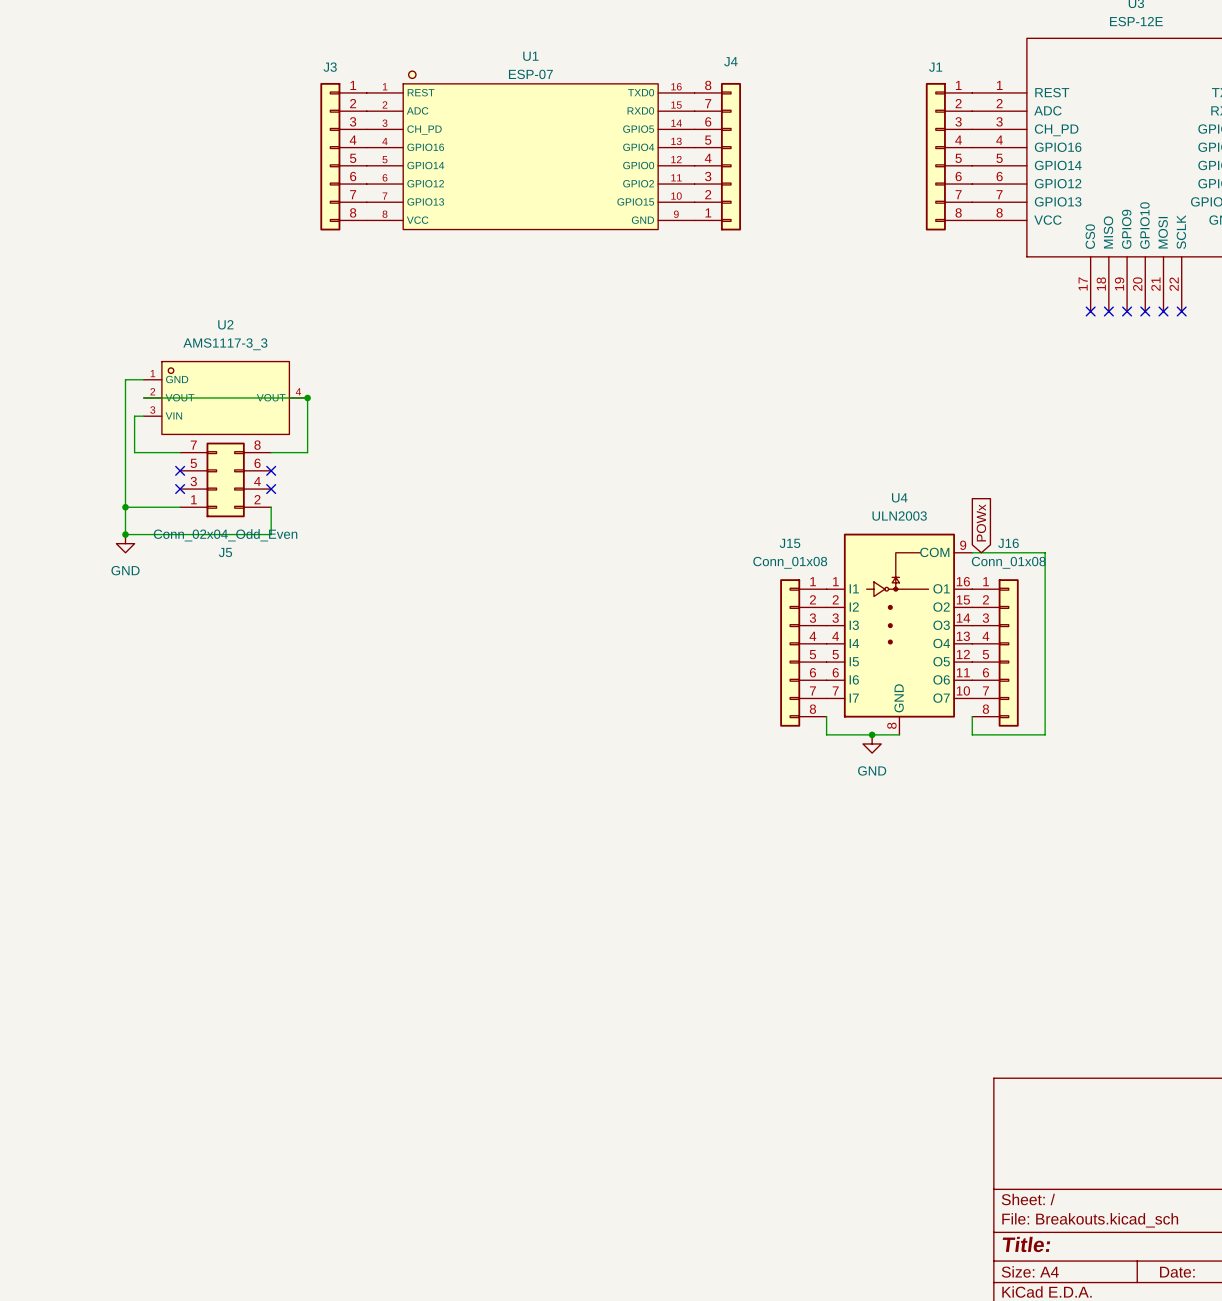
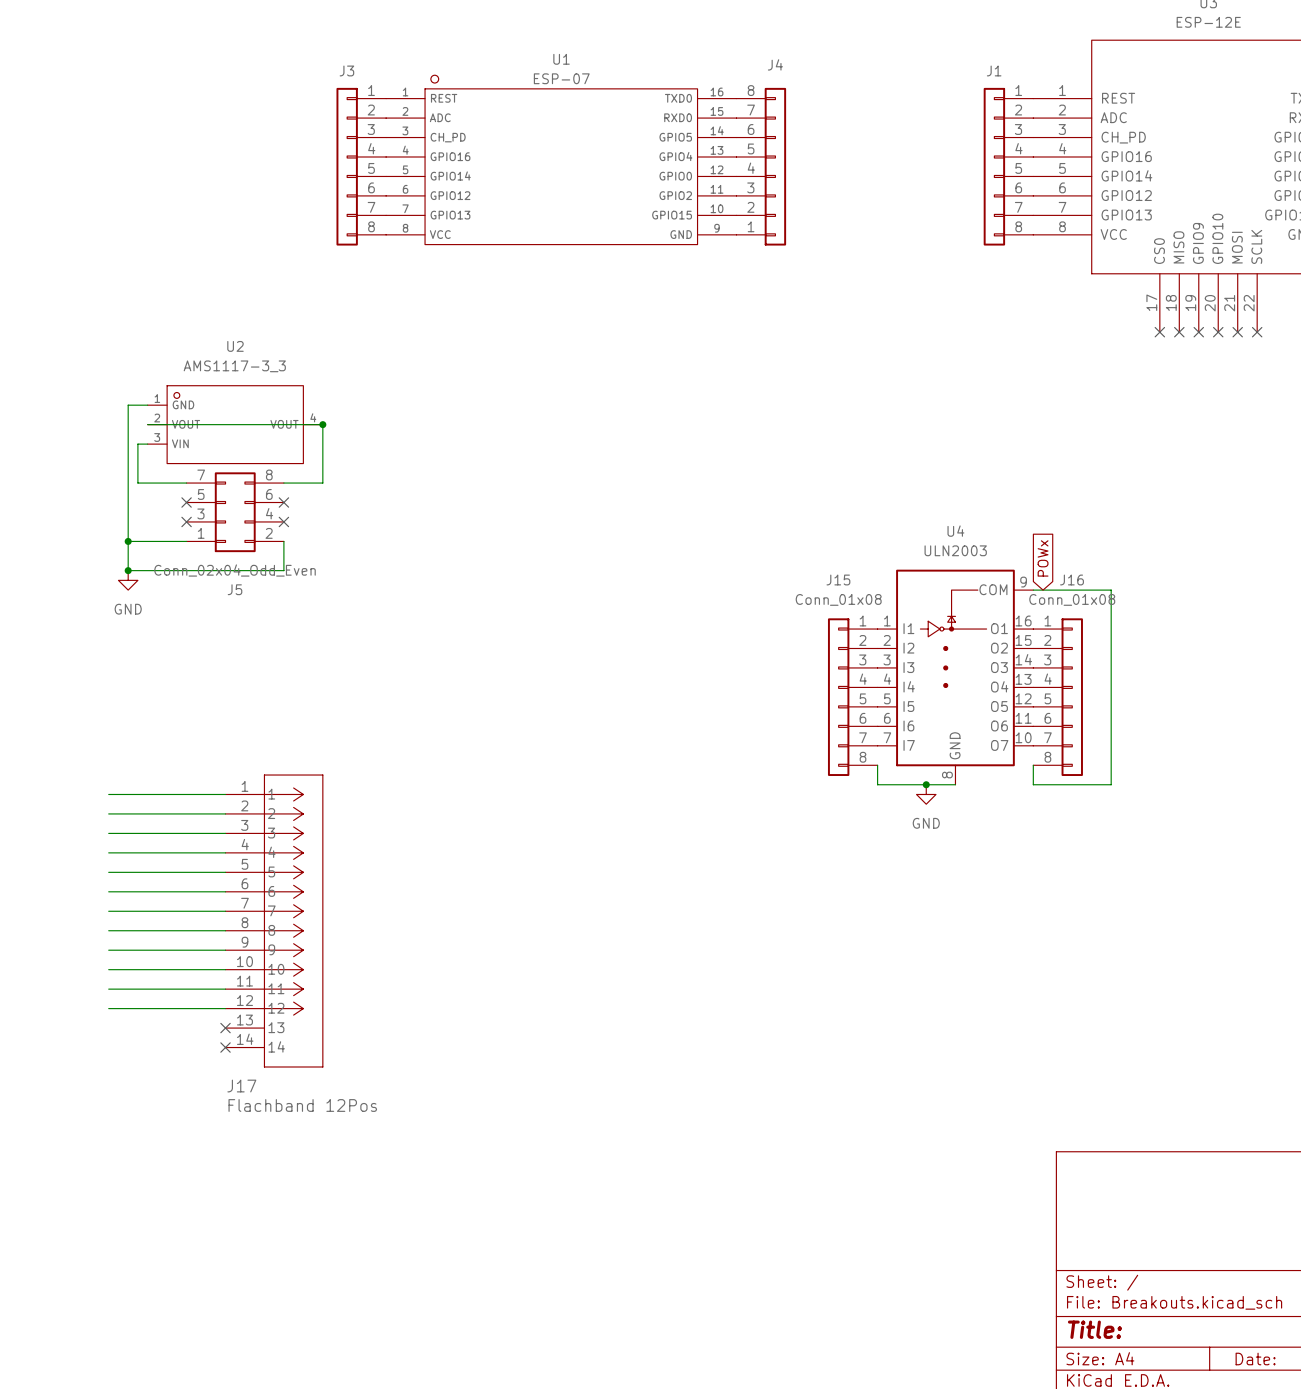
wire: none -> (108, 794) (225, 794)
wire: none -> (108, 813) (225, 813)
wire: none -> (108, 833) (225, 833)
wire: none -> (108, 852) (225, 852)
wire: none -> (108, 872) (225, 872)
wire: none -> (108, 891) (225, 891)
wire: none -> (108, 911) (225, 911)
J17: none -> Flachband 12Pos (274, 921)
wire: none -> (108, 930) (225, 930)
wire: none -> (108, 950) (225, 950)
wire: none -> (108, 969) (225, 969)
wire: none -> (108, 989) (225, 989)
wire: none -> (108, 1008) (225, 1008)
no-connect mark: none -> (225, 1028)
no-connect mark: none -> (225, 1047)

